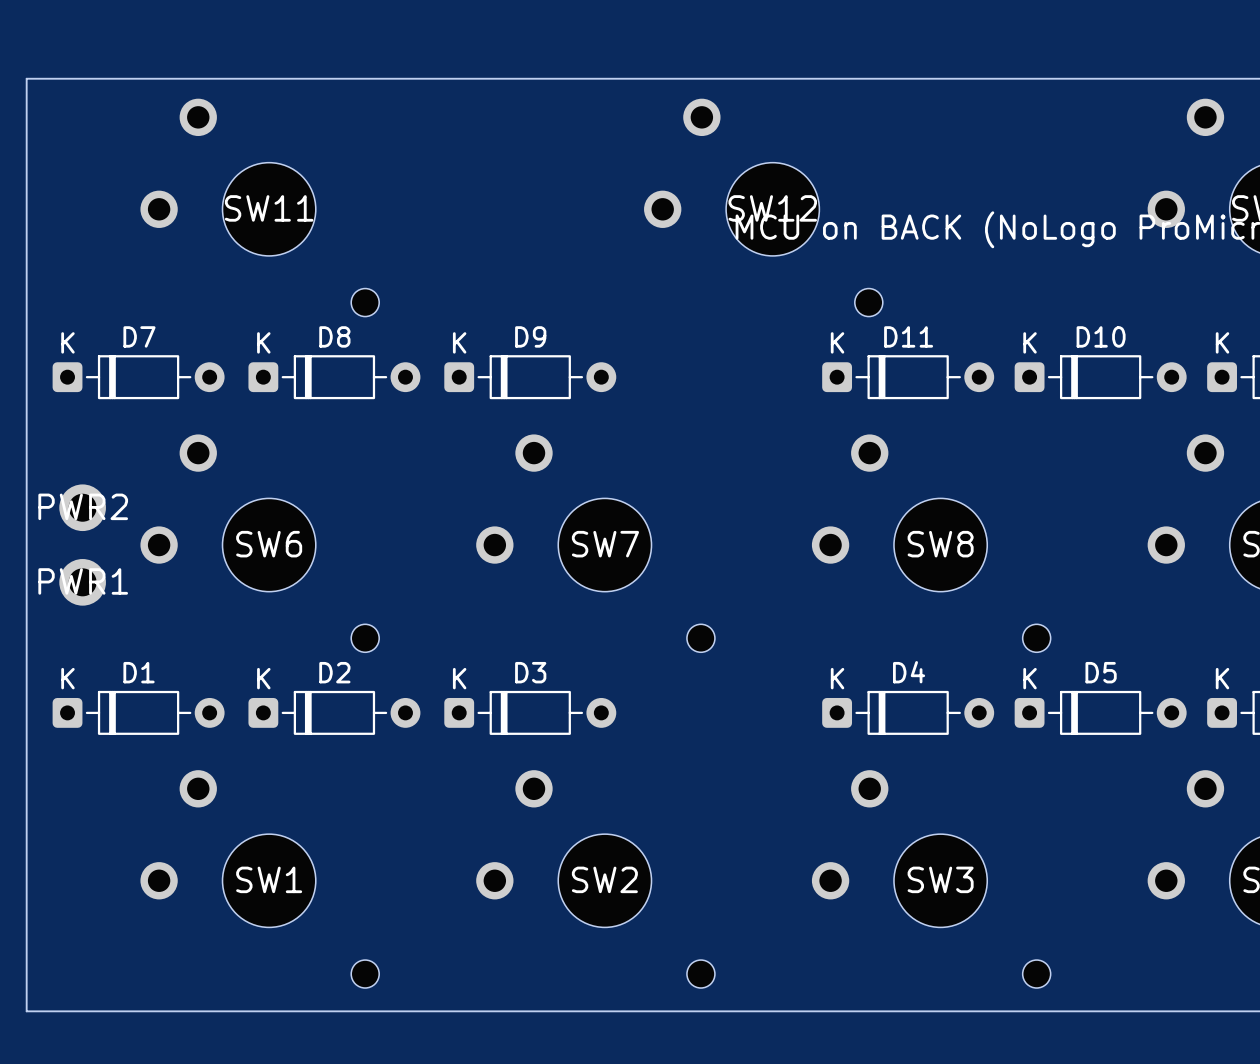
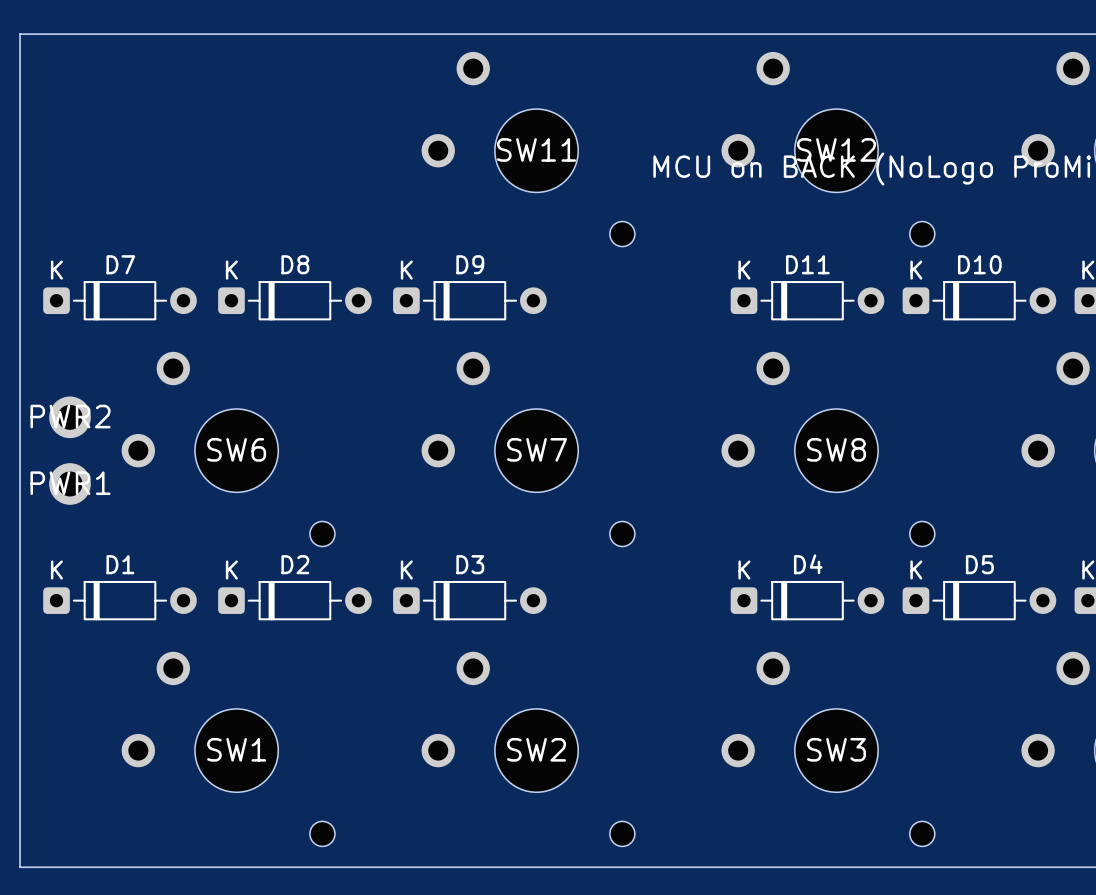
SW11 position: (259, 207) -> (528, 149)
SW12 position: (763, 207) -> (828, 149)

